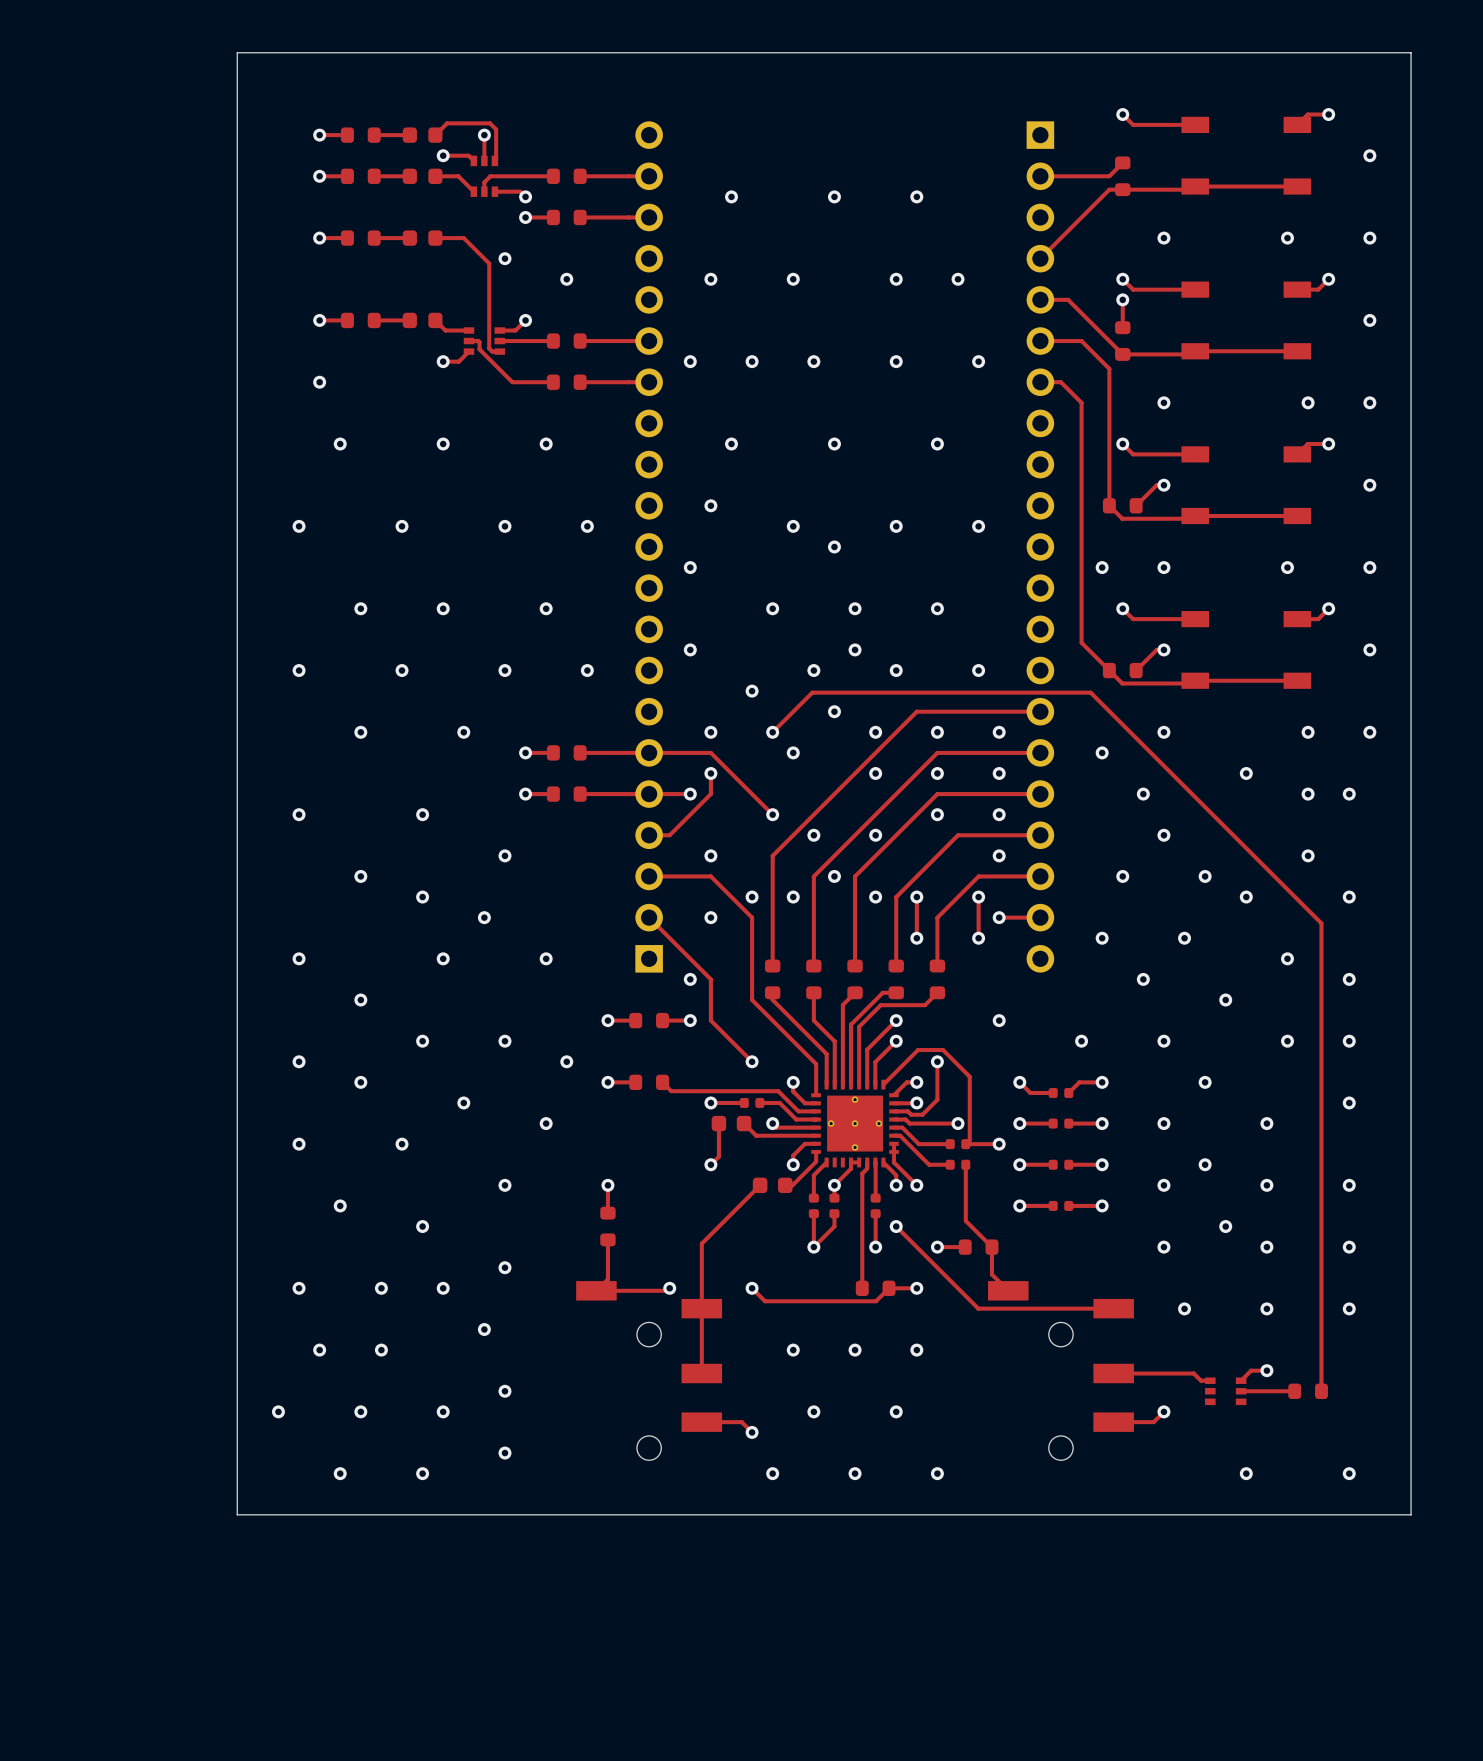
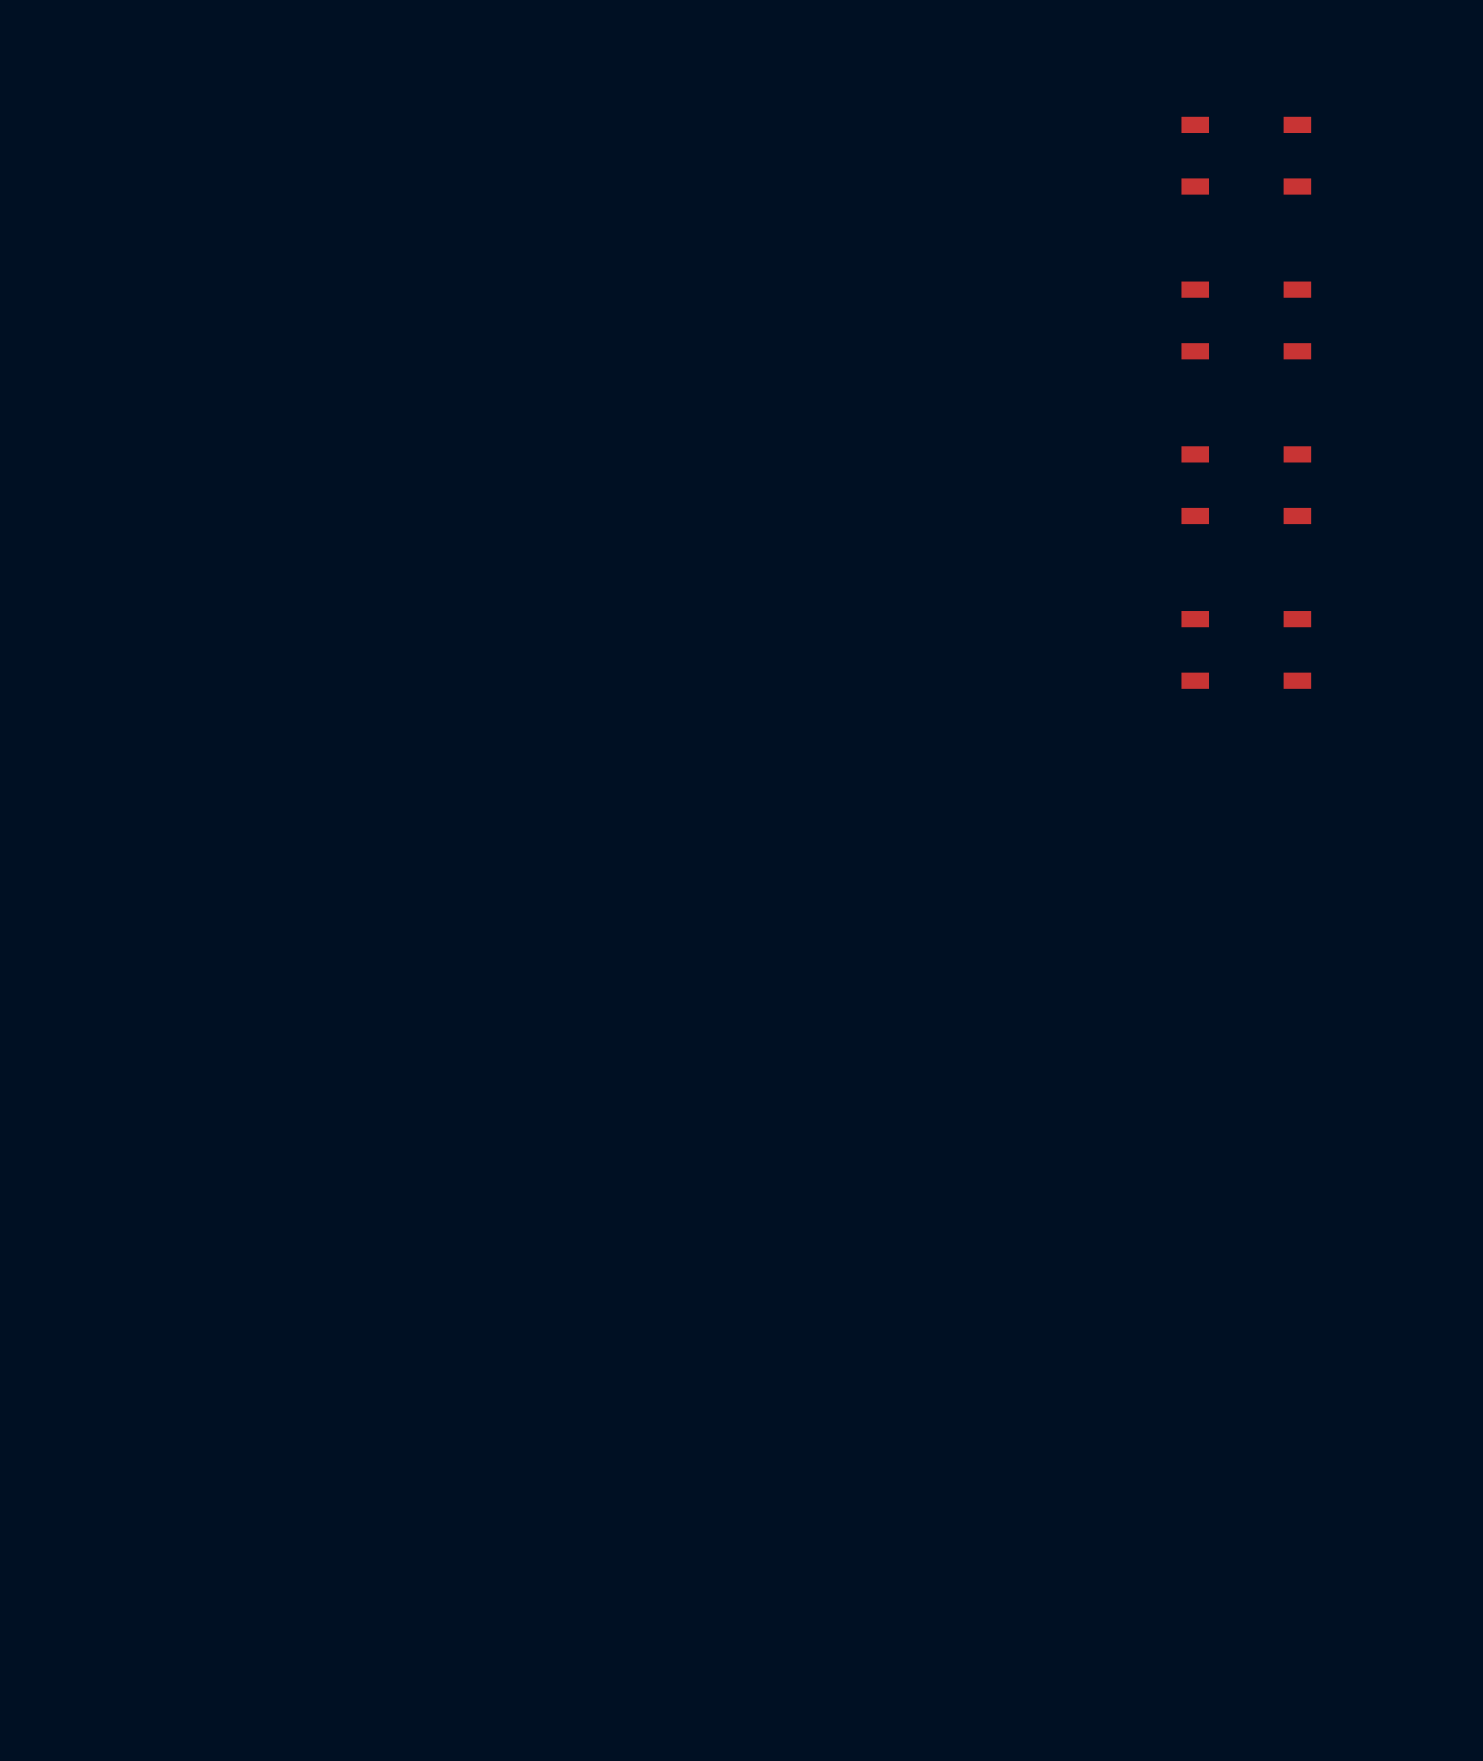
board edge: (1411, 52) (237, 52) (237, 1514) (1411, 1514) (1411, 52) -> none
top track: (1122, 114) (1133, 124) (1195, 124) -> none
via: (1122, 114) -> none
top track: (1328, 114) (1307, 114) (1297, 124) -> none
via: (1328, 114) -> none
via: (319, 135) -> none
top track: (347, 135) (319, 135) -> none
part: (360, 135) -> none
top track: (409, 135) (374, 135) -> none
part: (422, 135) -> none
top track: (435, 135) (447, 123) (490, 123) (496, 129) (494, 160) -> none
top track: (484, 135) (484, 160) -> none
via: (484, 135) -> none
top track: (443, 155) (468, 155) (473, 160) -> none
via: (443, 155) -> none
via: (1369, 155) -> none
top track: (1122, 162) (1109, 176) (1040, 176) -> none
via: (319, 176) -> none
top track: (347, 176) (319, 176) -> none
part: (360, 176) -> none
top track: (409, 176) (374, 176) -> none
part: (422, 176) -> none
top track: (435, 176) (458, 176) (473, 191) -> none
part: (484, 176) -> none
top track: (553, 176) (490, 176) (484, 182) (484, 191) -> none
part: (566, 176) -> none
top track: (649, 176) (580, 176) -> none
part: (1122, 176) -> none
top track: (1297, 186) (1195, 186) (1192, 189) (1109, 189) (1040, 258) -> none
top track: (494, 191) (520, 191) (525, 196) -> none
via: (525, 196) -> none
via: (731, 196) -> none
via: (834, 196) -> none
via: (916, 196) -> none
via: (525, 217) -> none
top track: (553, 217) (525, 217) -> none
part: (566, 217) -> none
top track: (649, 217) (580, 217) -> none
via: (319, 238) -> none
top track: (347, 238) (319, 238) -> none
part: (360, 238) -> none
top track: (409, 238) (374, 238) -> none
part: (422, 238) -> none
top track: (435, 238) (463, 238) (489, 263) (489, 348) (492, 351) (499, 351) -> none
via: (1163, 238) -> none
via: (1287, 238) -> none
via: (1369, 238) -> none
via: (504, 258) -> none
via: (566, 279) -> none
via: (710, 279) -> none
via: (793, 279) -> none
via: (896, 279) -> none
via: (958, 279) -> none
top track: (1122, 279) (1133, 289) (1195, 289) -> none
via: (1122, 279) -> none
top track: (1328, 279) (1318, 289) (1297, 289) -> none
via: (1328, 279) -> none
top track: (1040, 299) (1068, 299) (1122, 354) (1192, 354) (1195, 351) (1297, 351) -> none
top track: (1122, 299) (1122, 327) -> none
via: (1122, 299) -> none
via: (319, 320) -> none
top track: (347, 320) (319, 320) -> none
part: (360, 320) -> none
top track: (409, 320) (374, 320) -> none
part: (422, 320) -> none
top track: (435, 320) (445, 330) (468, 330) -> none
top track: (525, 320) (515, 330) (499, 330) -> none
via: (525, 320) -> none
via: (1369, 320) -> none
top track: (468, 341) (478, 341) (479, 349) (512, 382) (553, 382) -> none
part: (484, 341) -> none
top track: (553, 341) (499, 341) -> none
part: (566, 341) -> none
top track: (649, 341) (580, 341) -> none
top track: (1040, 341) (1081, 341) (1109, 368) (1109, 505) (1122, 518) (1192, 518) (1195, 516) (1297, 516) -> none
part: (1122, 341) -> none
top track: (468, 351) (458, 361) (443, 361) -> none
via: (443, 361) -> none
via: (690, 361) -> none
via: (752, 361) -> none
via: (813, 361) -> none
via: (896, 361) -> none
via: (978, 361) -> none
via: (319, 382) -> none
part: (566, 382) -> none
top track: (649, 382) (580, 382) -> none
top track: (1040, 382) (1060, 382) (1081, 402) (1081, 642) (1122, 683) (1192, 683) (1195, 680) (1297, 680) -> none
via: (1163, 402) -> none
via: (1308, 402) -> none
via: (1369, 402) -> none
via: (340, 444) -> none
via: (443, 444) -> none
via: (546, 444) -> none
via: (731, 444) -> none
via: (834, 444) -> none
via: (937, 444) -> none
top track: (1122, 444) (1133, 454) (1195, 454) -> none
via: (1122, 444) -> none
top track: (1328, 444) (1307, 444) (1297, 454) -> none
via: (1328, 444) -> none
top track: (1163, 485) (1156, 485) (1136, 505) -> none
via: (1163, 485) -> none
via: (1369, 485) -> none
via: (710, 505) -> none
part: (1122, 505) -> none
via: (299, 526) -> none
via: (402, 526) -> none
via: (504, 526) -> none
via: (587, 526) -> none
via: (793, 526) -> none
via: (896, 526) -> none
via: (978, 526) -> none
part: (649, 546) -> none
via: (834, 546) -> none
part: (1040, 546) -> none
via: (690, 567) -> none
via: (1102, 567) -> none
via: (1163, 567) -> none
via: (1287, 567) -> none
via: (1369, 567) -> none
via: (360, 608) -> none
via: (443, 608) -> none
via: (546, 608) -> none
via: (772, 608) -> none
via: (855, 608) -> none
via: (937, 608) -> none
top track: (1122, 608) (1133, 619) (1195, 619) -> none
via: (1122, 608) -> none
top track: (1328, 608) (1318, 619) (1297, 619) -> none
via: (1328, 608) -> none
via: (690, 649) -> none
via: (855, 649) -> none
top track: (1163, 649) (1156, 649) (1136, 670) -> none
via: (1163, 649) -> none
via: (1369, 649) -> none
via: (299, 670) -> none
via: (402, 670) -> none
via: (504, 670) -> none
via: (587, 670) -> none
via: (813, 670) -> none
via: (896, 670) -> none
via: (978, 670) -> none
part: (1122, 670) -> none
via: (752, 691) -> none
via: (834, 711) -> none
top track: (1040, 711) (916, 711) (772, 855) (772, 966) -> none
via: (360, 732) -> none
via: (463, 732) -> none
via: (710, 732) -> none
top track: (772, 732) (812, 692) (1090, 692) (1321, 923) (1321, 1391) -> none
via: (772, 732) -> none
via: (875, 732) -> none
via: (937, 732) -> none
via: (999, 732) -> none
via: (1163, 732) -> none
via: (1308, 732) -> none
via: (1369, 732) -> none
via: (525, 752) -> none
top track: (553, 752) (525, 752) -> none
part: (566, 752) -> none
top track: (580, 752) (710, 752) (772, 814) -> none
via: (793, 752) -> none
top track: (1040, 752) (937, 752) (813, 876) (813, 966) -> none
via: (1102, 752) -> none
top track: (710, 773) (710, 794) (669, 835) (649, 835) -> none
via: (710, 773) -> none
via: (875, 773) -> none
via: (937, 773) -> none
via: (999, 773) -> none
via: (1246, 773) -> none
via: (525, 794) -> none
top track: (553, 794) (525, 794) -> none
part: (566, 794) -> none
top track: (690, 794) (580, 794) -> none
via: (690, 794) -> none
top track: (1040, 794) (937, 794) (855, 876) (855, 966) -> none
via: (1143, 794) -> none
via: (1308, 794) -> none
via: (1349, 794) -> none
via: (299, 814) -> none
via: (422, 814) -> none
via: (772, 814) -> none
via: (937, 814) -> none
via: (999, 814) -> none
via: (813, 835) -> none
via: (875, 835) -> none
top track: (1040, 835) (958, 835) (896, 897) (896, 966) -> none
via: (1163, 835) -> none
via: (504, 855) -> none
via: (710, 855) -> none
via: (999, 855) -> none
via: (1308, 855) -> none
via: (360, 876) -> none
top track: (649, 876) (710, 876) (752, 917) (752, 1000) (816, 1064) (816, 1095) -> none
via: (834, 876) -> none
top track: (1040, 876) (978, 876) (937, 917) (937, 966) -> none
via: (1122, 876) -> none
via: (1205, 876) -> none
via: (422, 897) -> none
via: (752, 897) -> none
via: (793, 897) -> none
via: (875, 897) -> none
top track: (916, 897) (916, 938) -> none
via: (916, 897) -> none
top track: (978, 897) (978, 938) -> none
via: (978, 897) -> none
via: (1246, 897) -> none
via: (1349, 897) -> none
via: (484, 917) -> none
top track: (649, 917) (710, 979) (710, 1020) (752, 1061) -> none
via: (710, 917) -> none
via: (999, 917) -> none
top track: (1040, 917) (999, 917) -> none
via: (916, 938) -> none
via: (978, 938) -> none
via: (1102, 938) -> none
via: (1184, 938) -> none
via: (299, 958) -> none
via: (443, 958) -> none
via: (546, 958) -> none
via: (1287, 958) -> none
via: (690, 979) -> none
part: (772, 979) -> none
part: (813, 979) -> none
part: (855, 979) -> none
part: (896, 979) -> none
part: (937, 979) -> none
via: (1143, 979) -> none
via: (1349, 979) -> none
top track: (772, 992) (772, 1000) (826, 1054) (826, 1084) -> none
top track: (813, 992) (813, 1020) (834, 1041) (834, 1084) -> none
top track: (855, 992) (842, 1004) (842, 1084) -> none
top track: (896, 992) (882, 992) (851, 1024) (851, 1084) -> none
top track: (937, 992) (925, 1005) (880, 1005) (859, 1026) (859, 1084) -> none
via: (360, 1000) -> none
via: (1225, 1000) -> none
via: (607, 1020) -> none
top track: (635, 1020) (607, 1020) -> none
part: (649, 1020) -> none
top track: (690, 1020) (662, 1020) -> none
via: (690, 1020) -> none
top track: (896, 1020) (867, 1049) (867, 1084) -> none
via: (896, 1020) -> none
via: (999, 1020) -> none
via: (422, 1041) -> none
via: (504, 1041) -> none
top track: (896, 1041) (875, 1062) (875, 1084) -> none
via: (896, 1041) -> none
via: (1081, 1041) -> none
via: (1163, 1041) -> none
via: (1287, 1041) -> none
via: (1349, 1041) -> none
via: (299, 1061) -> none
via: (566, 1061) -> none
via: (752, 1061) -> none
top track: (937, 1061) (937, 1099) (922, 1114) (911, 1114) (907, 1111) (893, 1111) -> none
via: (937, 1061) -> none
via: (360, 1082) -> none
via: (607, 1082) -> none
top track: (635, 1082) (607, 1082) -> none
part: (649, 1082) -> none
top track: (662, 1082) (671, 1091) (778, 1091) (798, 1111) (816, 1111) -> none
top track: (793, 1082) (793, 1091) (805, 1103) (816, 1103) -> none
via: (793, 1082) -> none
top track: (916, 1082) (906, 1082) (893, 1095) -> none
via: (916, 1082) -> none
top track: (1019, 1082) (1030, 1093) (1053, 1093) -> none
via: (1019, 1082) -> none
top track: (1102, 1082) (1079, 1082) (1068, 1093) -> none
via: (1102, 1082) -> none
via: (1205, 1082) -> none
top track: (883, 1084) (918, 1050) (943, 1050) (969, 1076) (969, 1140) (965, 1144) (999, 1144) -> none
part: (1060, 1093) -> none
via: (463, 1102) -> none
via: (710, 1102) -> none
top track: (744, 1102) (710, 1102) -> none
part: (752, 1102) -> none
top track: (759, 1102) (779, 1102) (796, 1119) (815, 1120) -> none
top track: (916, 1102) (893, 1103) -> none
via: (916, 1102) -> none
via: (1349, 1102) -> none
top track: (893, 1119) (905, 1119) (909, 1123) (958, 1123) -> none
via: (546, 1123) -> none
top track: (718, 1123) (718, 1156) (710, 1164) -> none
part: (731, 1123) -> none
top track: (744, 1123) (756, 1135) (816, 1135) -> none
top track: (772, 1123) (776, 1127) (816, 1127) -> none
via: (772, 1123) -> none
part: (855, 1123) -> none
via: (958, 1123) -> none
via: (1019, 1123) -> none
top track: (1053, 1123) (1019, 1123) -> none
part: (1060, 1123) -> none
top track: (1102, 1123) (1068, 1123) -> none
via: (1102, 1123) -> none
via: (1163, 1123) -> none
via: (1266, 1123) -> none
top track: (893, 1127) (902, 1127) (918, 1144) (950, 1144) -> none
top track: (893, 1135) (900, 1135) (929, 1164) (950, 1164) -> none
top track: (816, 1143) (805, 1143) (793, 1155) (793, 1164) -> none
top track: (893, 1143) (893, 1162) (916, 1185) -> none
via: (299, 1144) -> none
via: (402, 1144) -> none
part: (958, 1144) -> none
via: (999, 1144) -> none
top track: (816, 1151) (816, 1161) (792, 1185) (785, 1185) -> none
top track: (826, 1162) (813, 1175) (813, 1198) -> none
top track: (859, 1162) (851, 1162) (851, 1168) (834, 1185) (834, 1198) -> none
top track: (867, 1162) (867, 1168) (862, 1173) (862, 1288) -> none
top track: (875, 1162) (875, 1198) -> none
top track: (883, 1162) (896, 1175) (896, 1185) -> none
via: (710, 1164) -> none
via: (793, 1164) -> none
part: (958, 1164) -> none
top track: (965, 1164) (965, 1220) (991, 1247) (991, 1274) (1008, 1290) -> none
via: (1019, 1164) -> none
top track: (1053, 1164) (1019, 1164) -> none
part: (1060, 1164) -> none
top track: (1102, 1164) (1068, 1164) -> none
via: (1102, 1164) -> none
via: (1205, 1164) -> none
via: (504, 1185) -> none
top track: (607, 1185) (607, 1213) -> none
via: (607, 1185) -> none
top track: (760, 1185) (701, 1243) (701, 1373) -> none
part: (772, 1185) -> none
via: (834, 1185) -> none
via: (896, 1185) -> none
via: (916, 1185) -> none
via: (1163, 1185) -> none
via: (1266, 1185) -> none
via: (1349, 1185) -> none
via: (340, 1205) -> none
part: (813, 1205) -> none
part: (834, 1205) -> none
part: (875, 1205) -> none
via: (1019, 1205) -> none
top track: (1053, 1205) (1019, 1205) -> none
part: (1060, 1205) -> none
top track: (1102, 1205) (1068, 1205) -> none
via: (1102, 1205) -> none
top track: (834, 1213) (834, 1226) (813, 1247) (813, 1213) -> none
top track: (875, 1213) (875, 1247) -> none
via: (422, 1226) -> none
part: (607, 1226) -> none
top track: (896, 1226) (978, 1308) (1113, 1308) -> none
via: (896, 1226) -> none
via: (1225, 1226) -> none
top track: (607, 1239) (607, 1279) (596, 1290) (667, 1290) (669, 1288) -> none
via: (813, 1247) -> none
via: (875, 1247) -> none
via: (937, 1247) -> none
top track: (965, 1247) (937, 1247) -> none
part: (978, 1247) -> none
via: (1163, 1247) -> none
via: (1266, 1247) -> none
via: (1349, 1247) -> none
via: (504, 1267) -> none
via: (299, 1288) -> none
via: (381, 1288) -> none
via: (443, 1288) -> none
via: (669, 1288) -> none
via: (752, 1288) -> none
part: (875, 1288) -> none
top track: (916, 1288) (889, 1288) (876, 1301) (765, 1301) (752, 1288) -> none
via: (916, 1288) -> none
via: (1184, 1308) -> none
via: (1266, 1308) -> none
via: (1349, 1308) -> none
via: (484, 1329) -> none
via: (319, 1350) -> none
via: (381, 1350) -> none
via: (793, 1350) -> none
via: (855, 1350) -> none
via: (916, 1350) -> none
part: (649, 1370) -> none
part: (1060, 1370) -> none
top track: (1266, 1370) (1251, 1370) (1241, 1380) -> none
via: (1266, 1370) -> none
top track: (1113, 1373) (1193, 1373) (1200, 1380) (1210, 1380) -> none
via: (504, 1391) -> none
part: (1225, 1391) -> none
top track: (1294, 1391) (1241, 1391) -> none
part: (1308, 1391) -> none
via: (278, 1411) -> none
via: (360, 1411) -> none
via: (443, 1411) -> none
via: (813, 1411) -> none
via: (896, 1411) -> none
top track: (1163, 1411) (1153, 1422) (1113, 1422) -> none
via: (1163, 1411) -> none
top track: (701, 1422) (741, 1422) (752, 1432) -> none
via: (752, 1432) -> none
via: (504, 1453) -> none
via: (340, 1473) -> none
via: (422, 1473) -> none
via: (772, 1473) -> none
via: (855, 1473) -> none
via: (937, 1473) -> none
via: (1246, 1473) -> none
via: (1349, 1473) -> none

